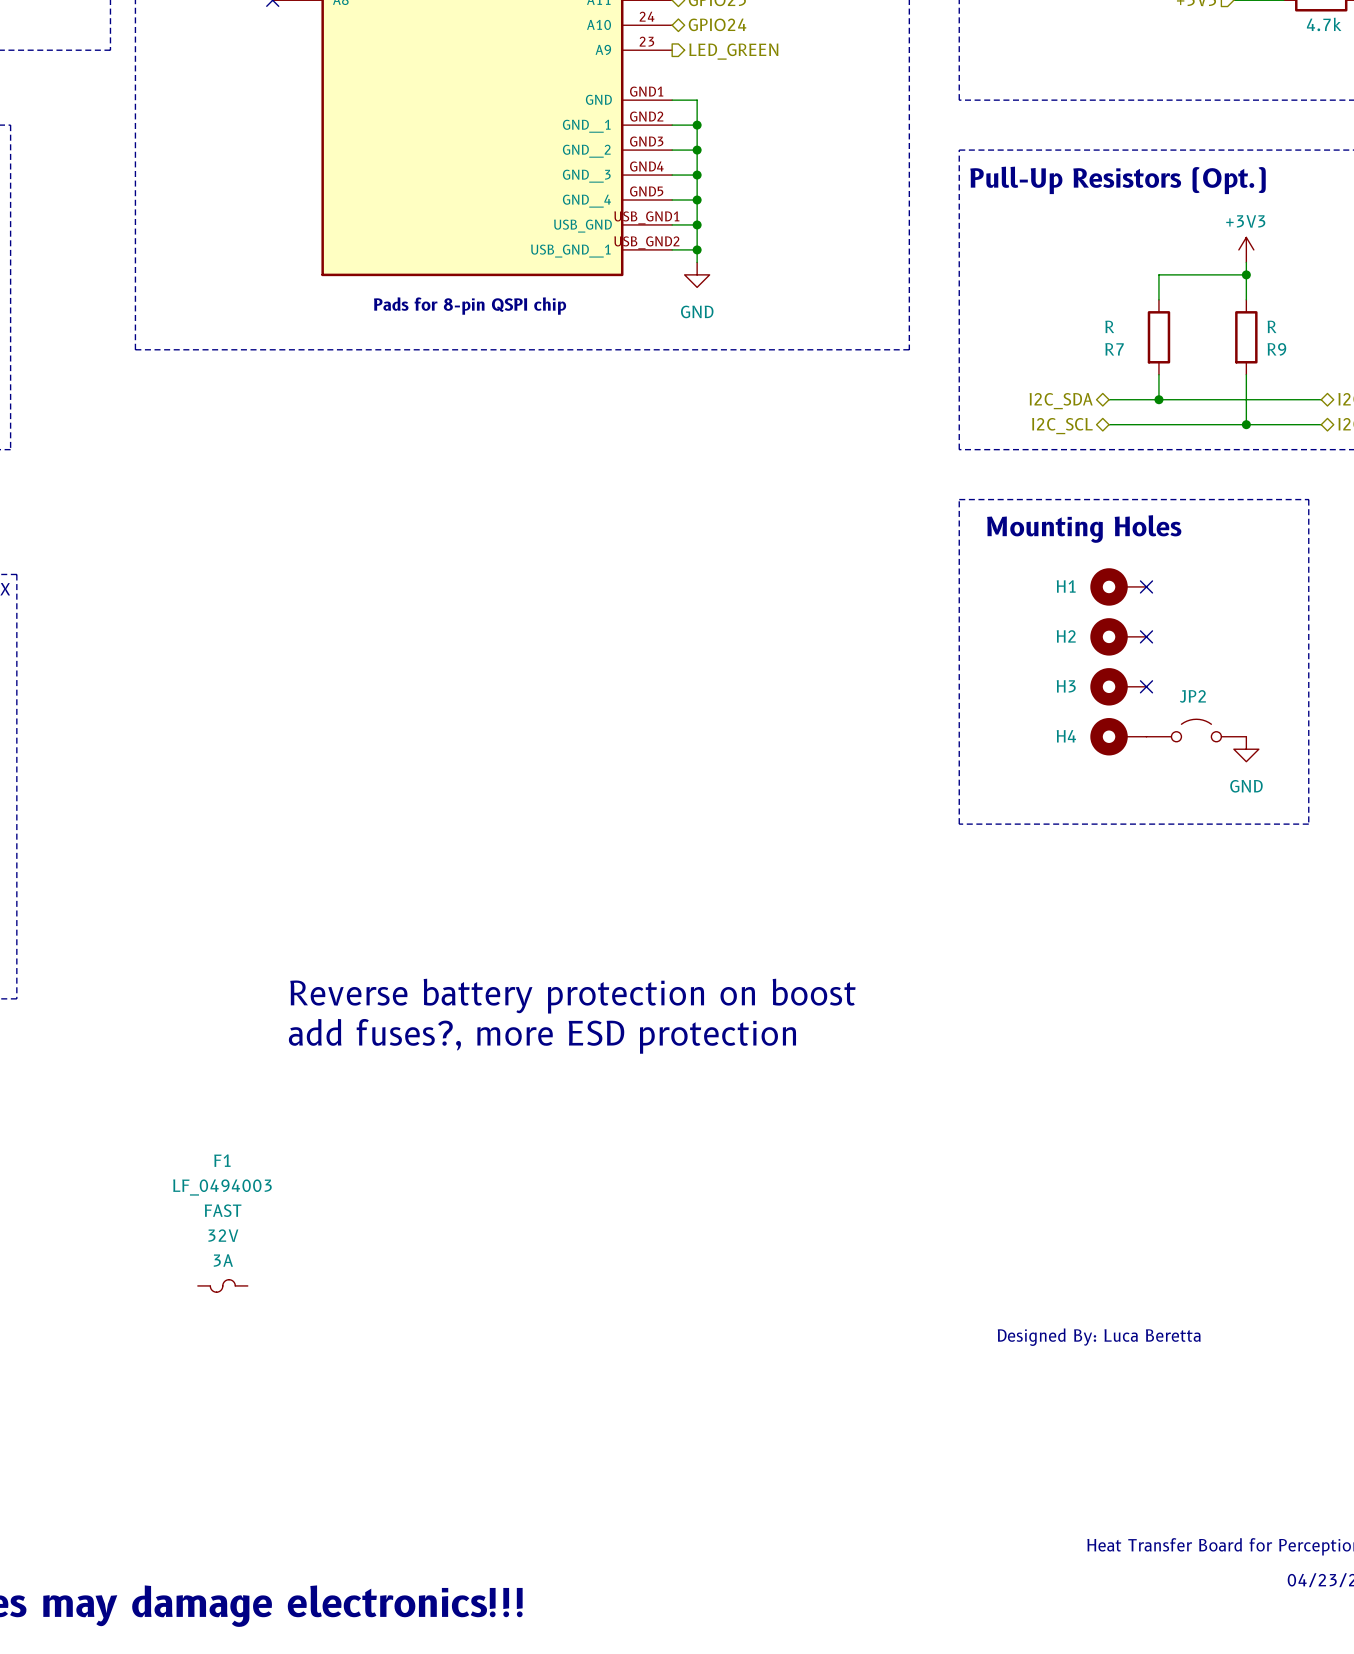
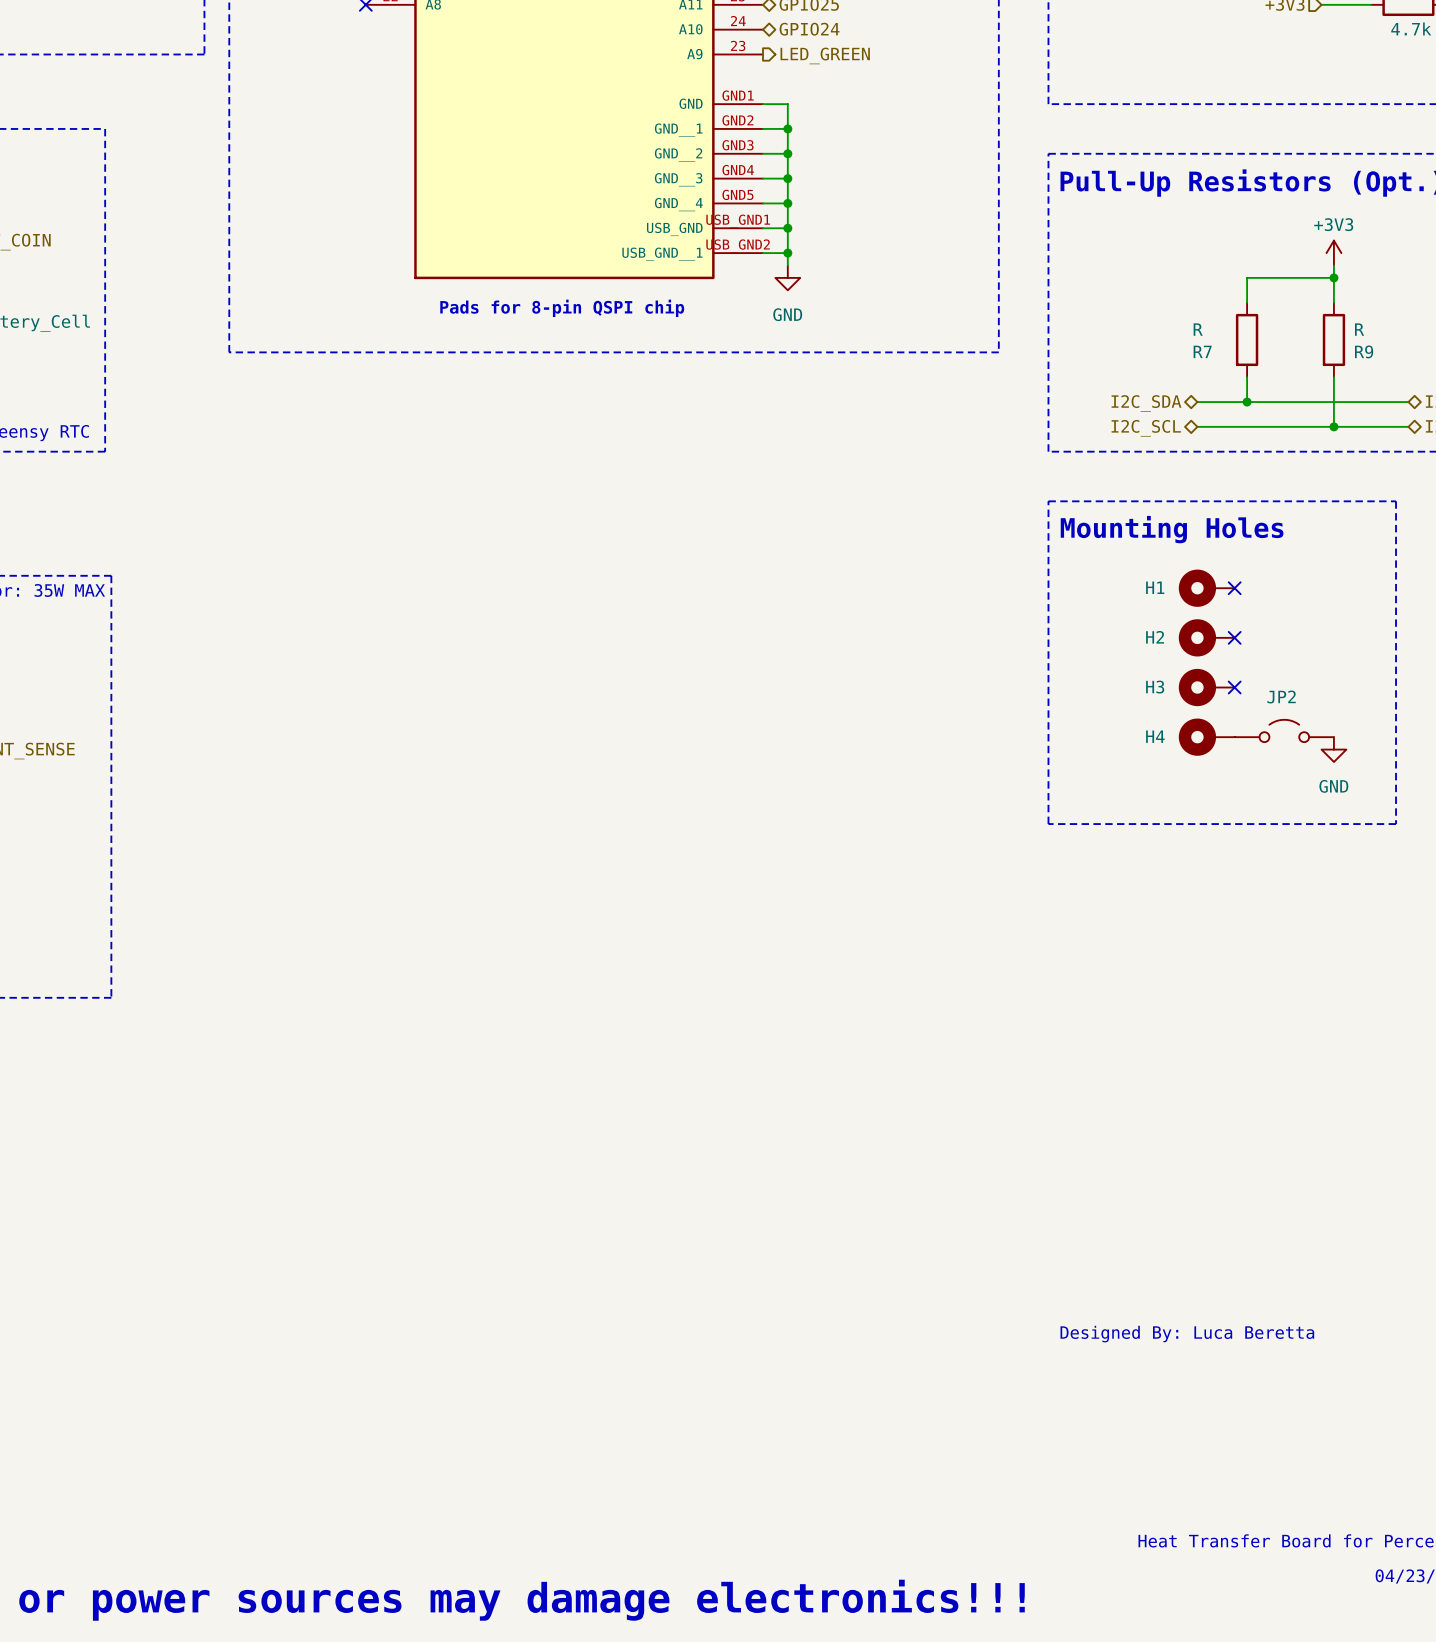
text: Reverse battery protection on boost (572, 996) -> none
text: add fuses?, more ESD protection (542, 1036) -> none
F1: LF_0494003 (222, 1285) -> none

